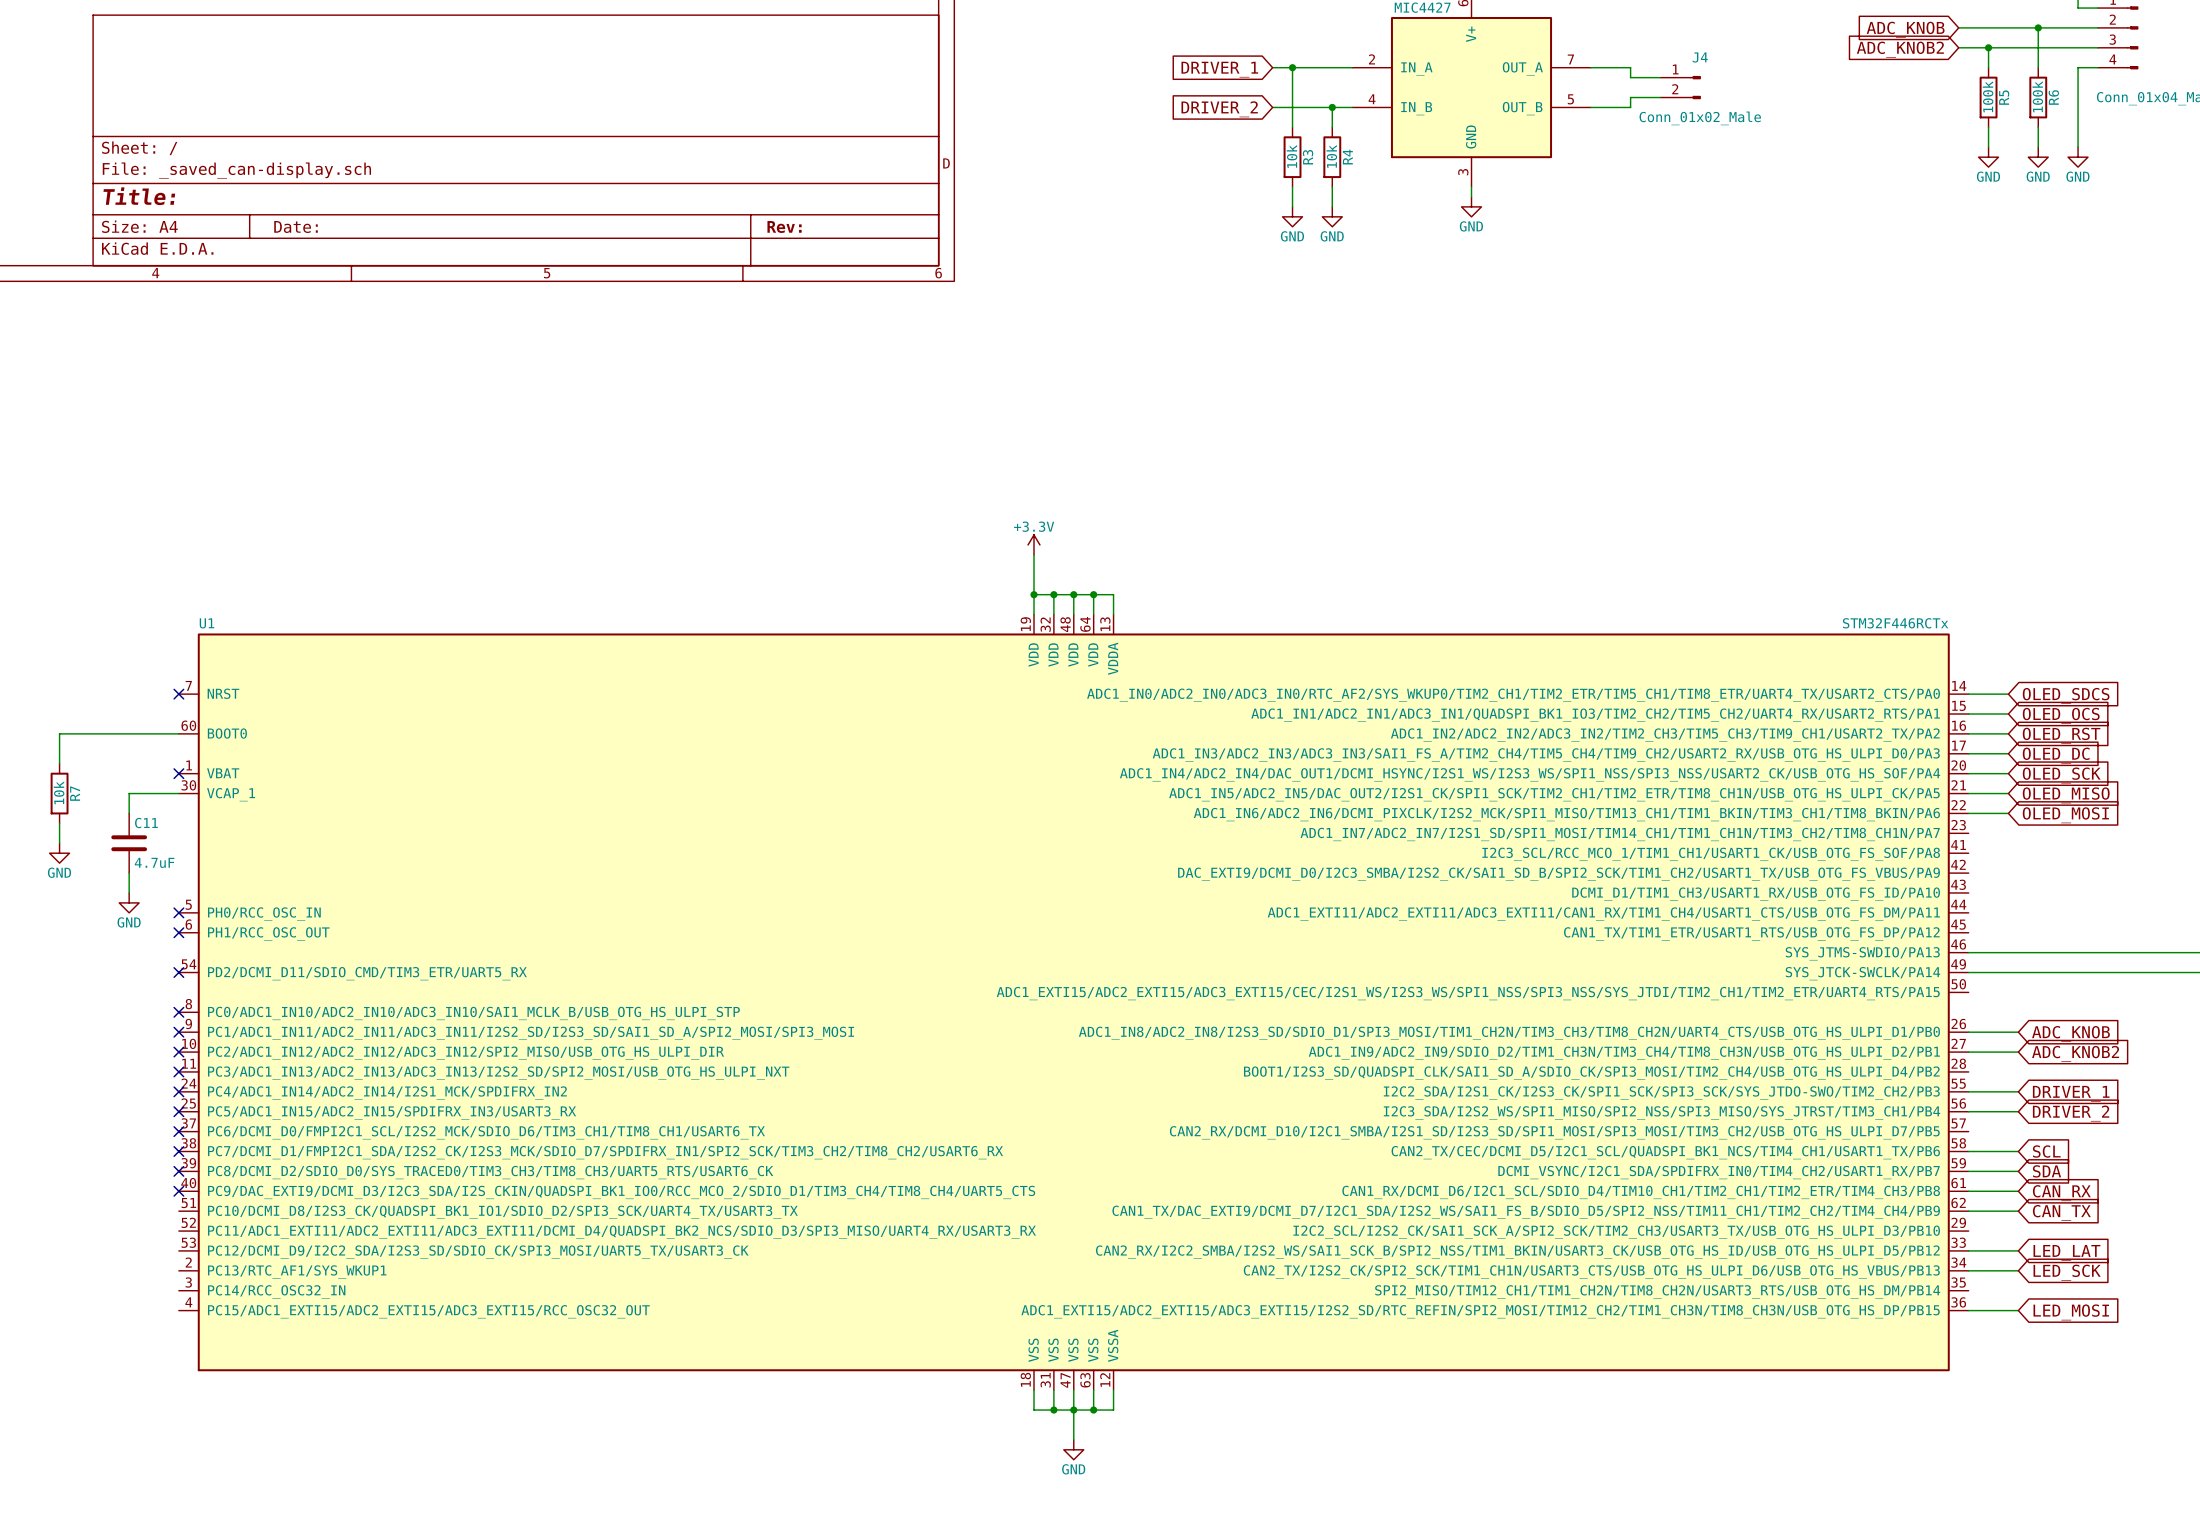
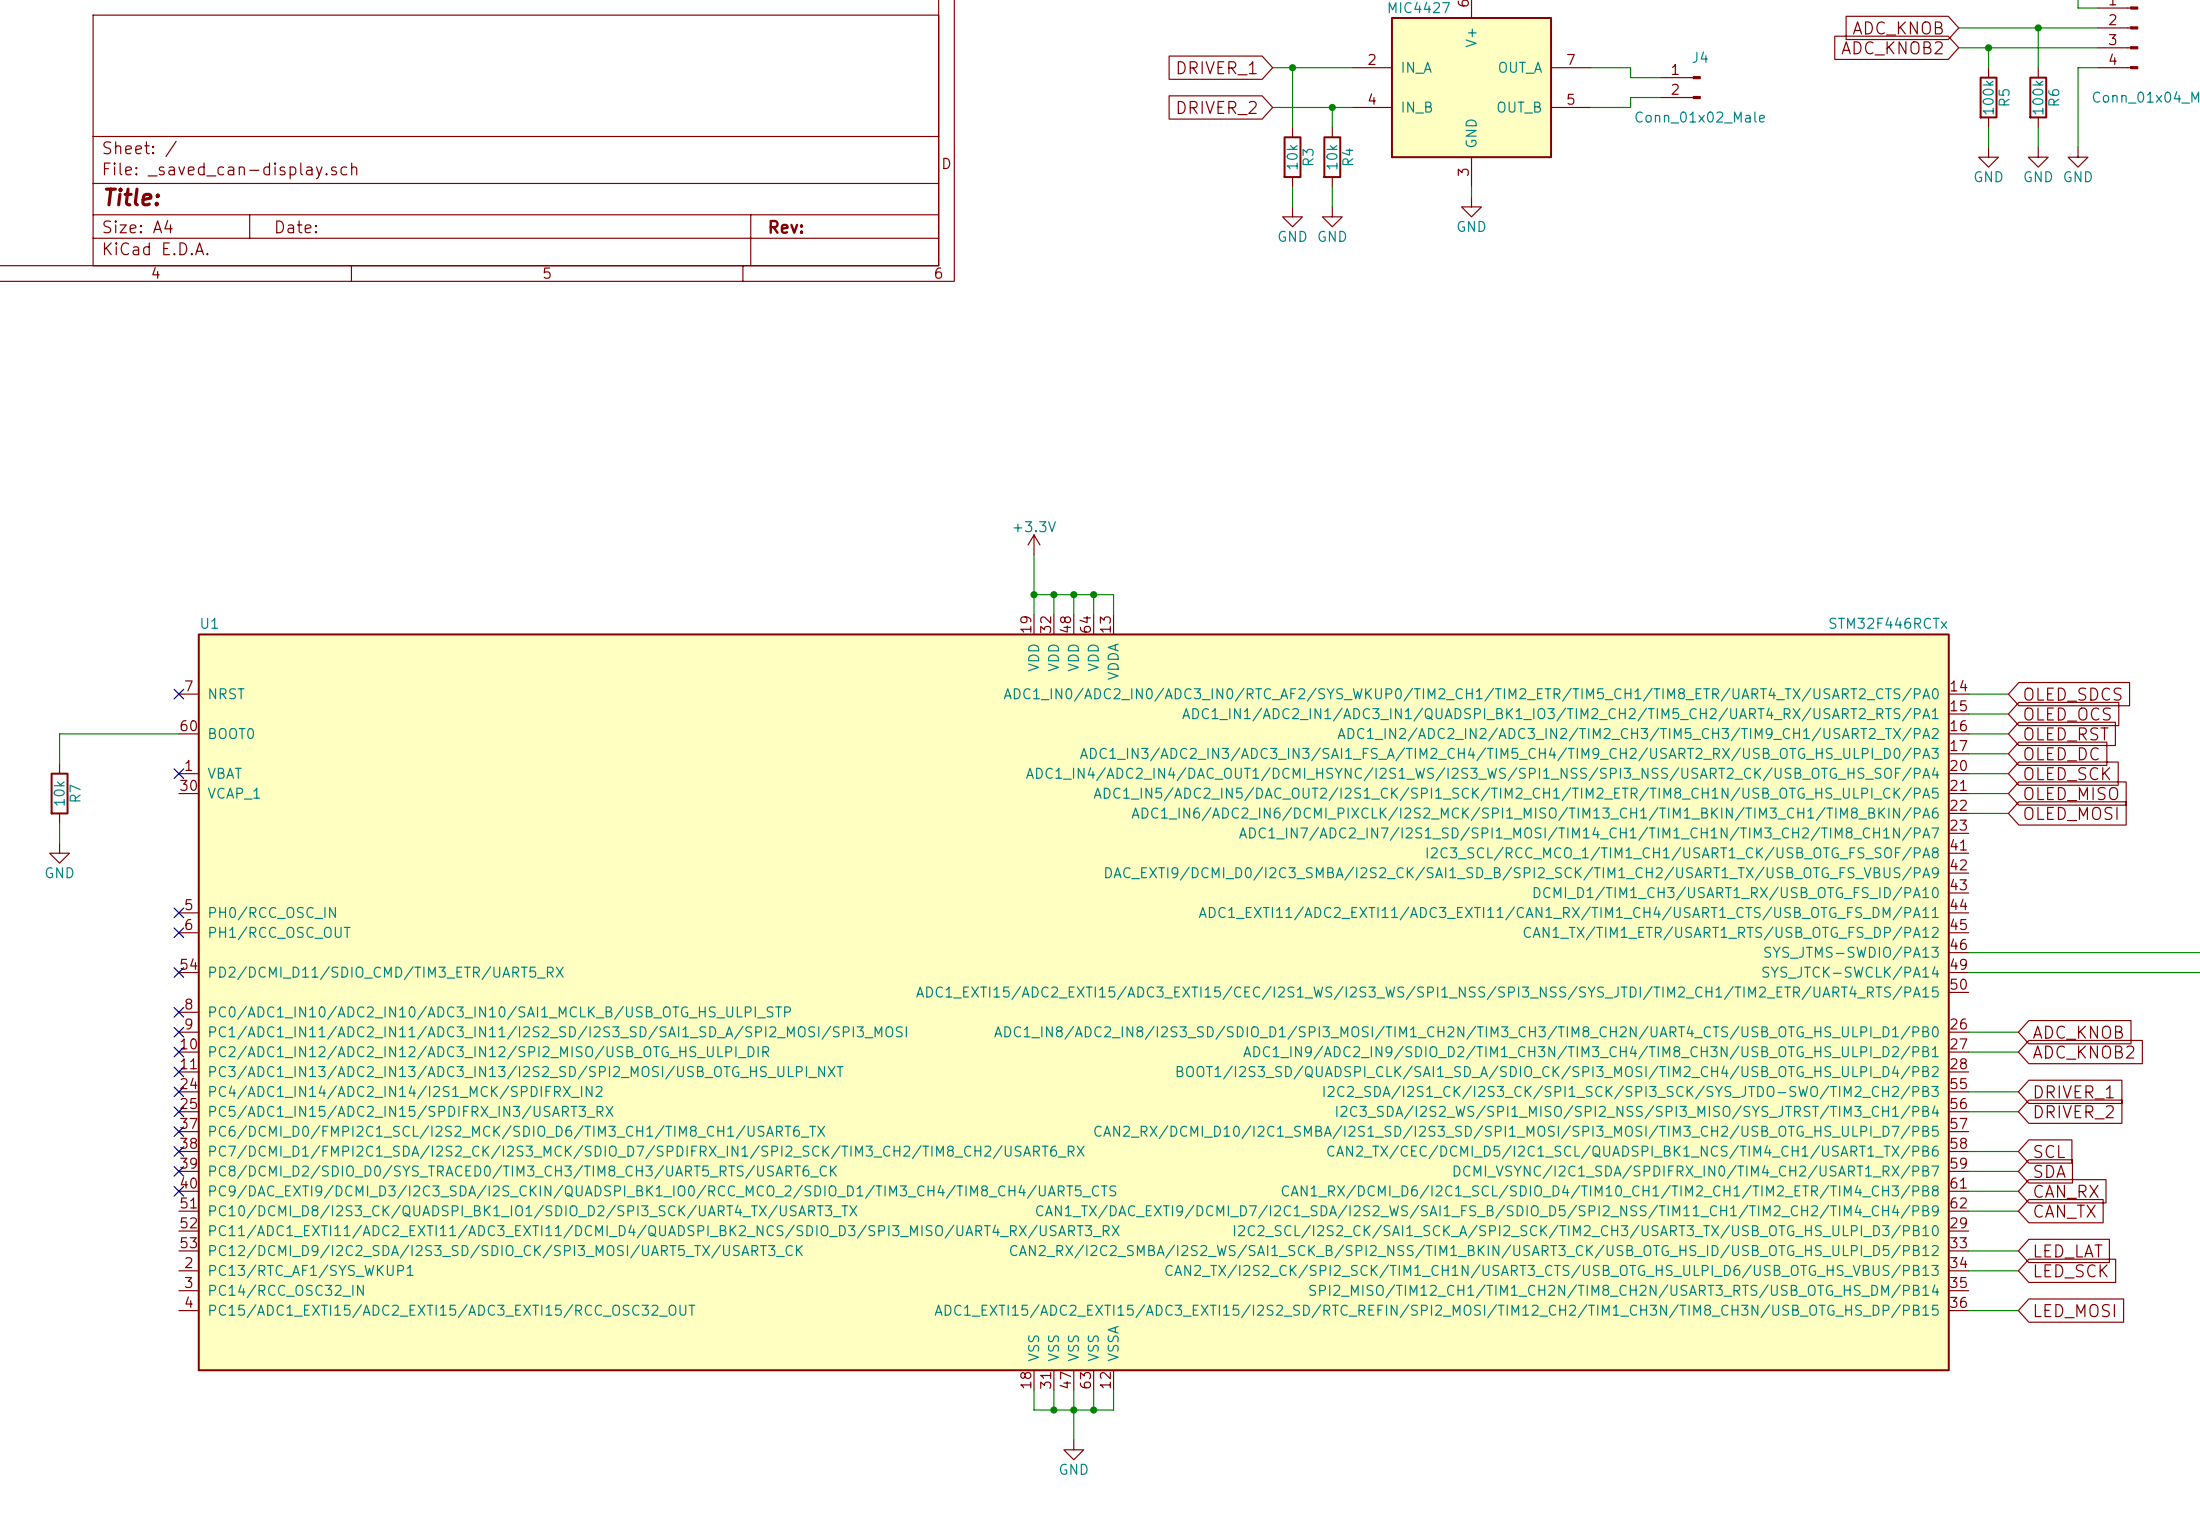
wire: (178, 793) (129, 793) (129, 813) -> none
C11: 4.7uF (129, 843) -> none
wire: (129, 873) (129, 892) -> none
power symbol: GND (129, 902) -> none

